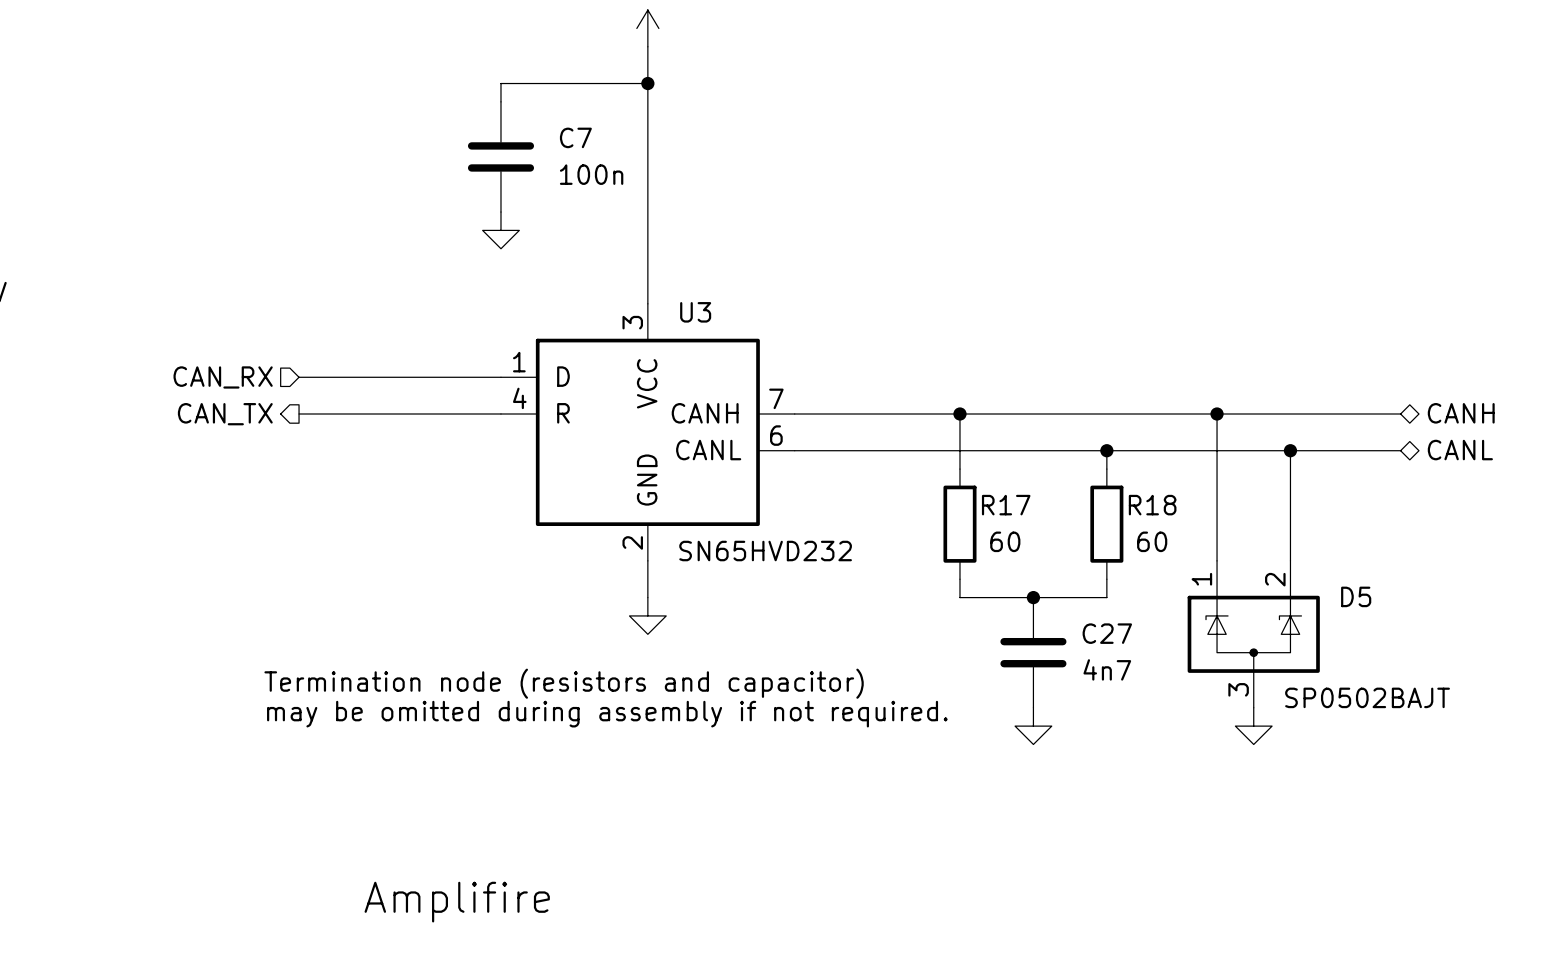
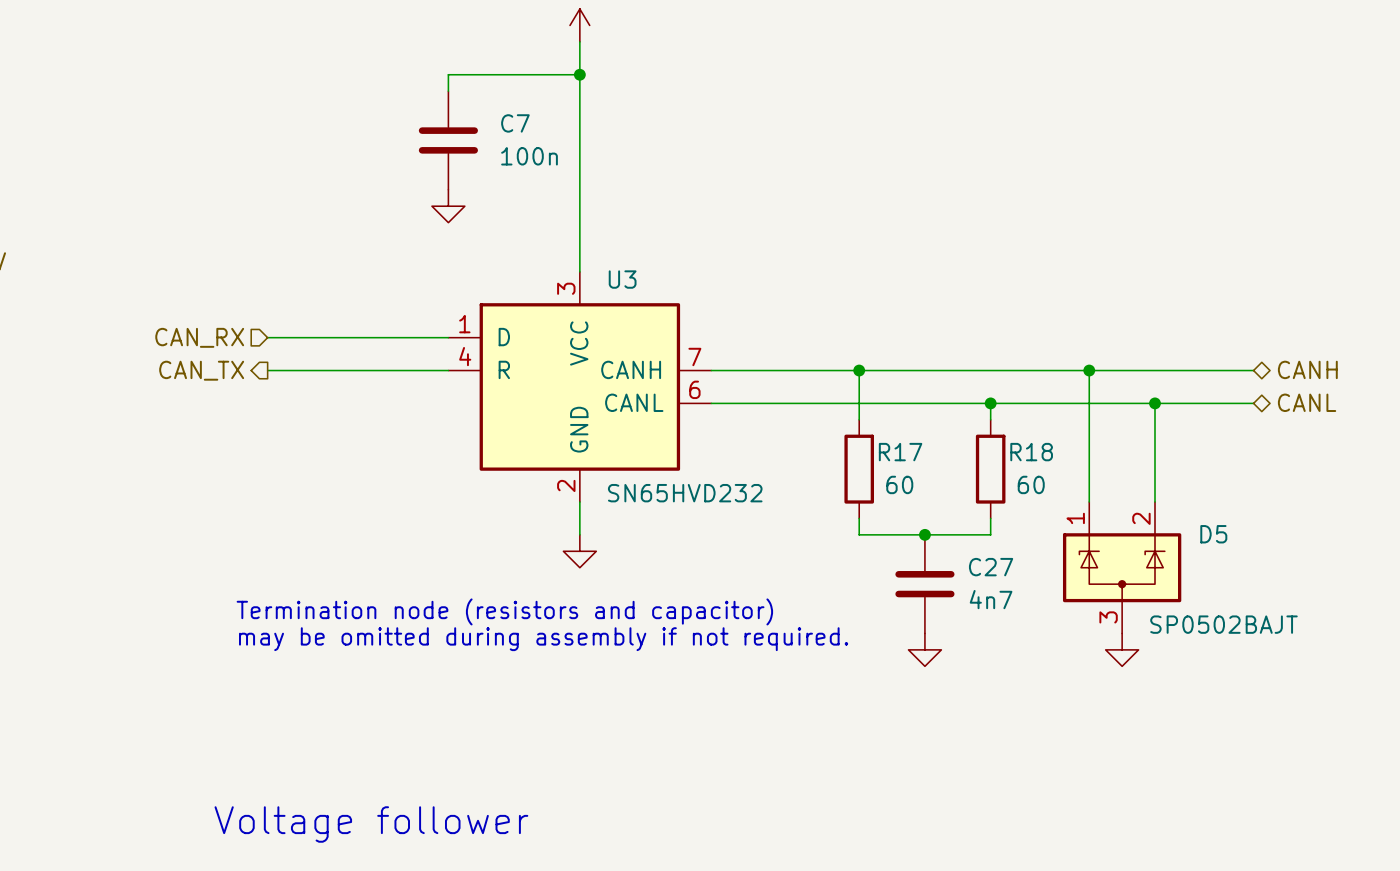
text: Amplifire (457, 902) -> none
text: none -> Voltage follower (371, 824)

